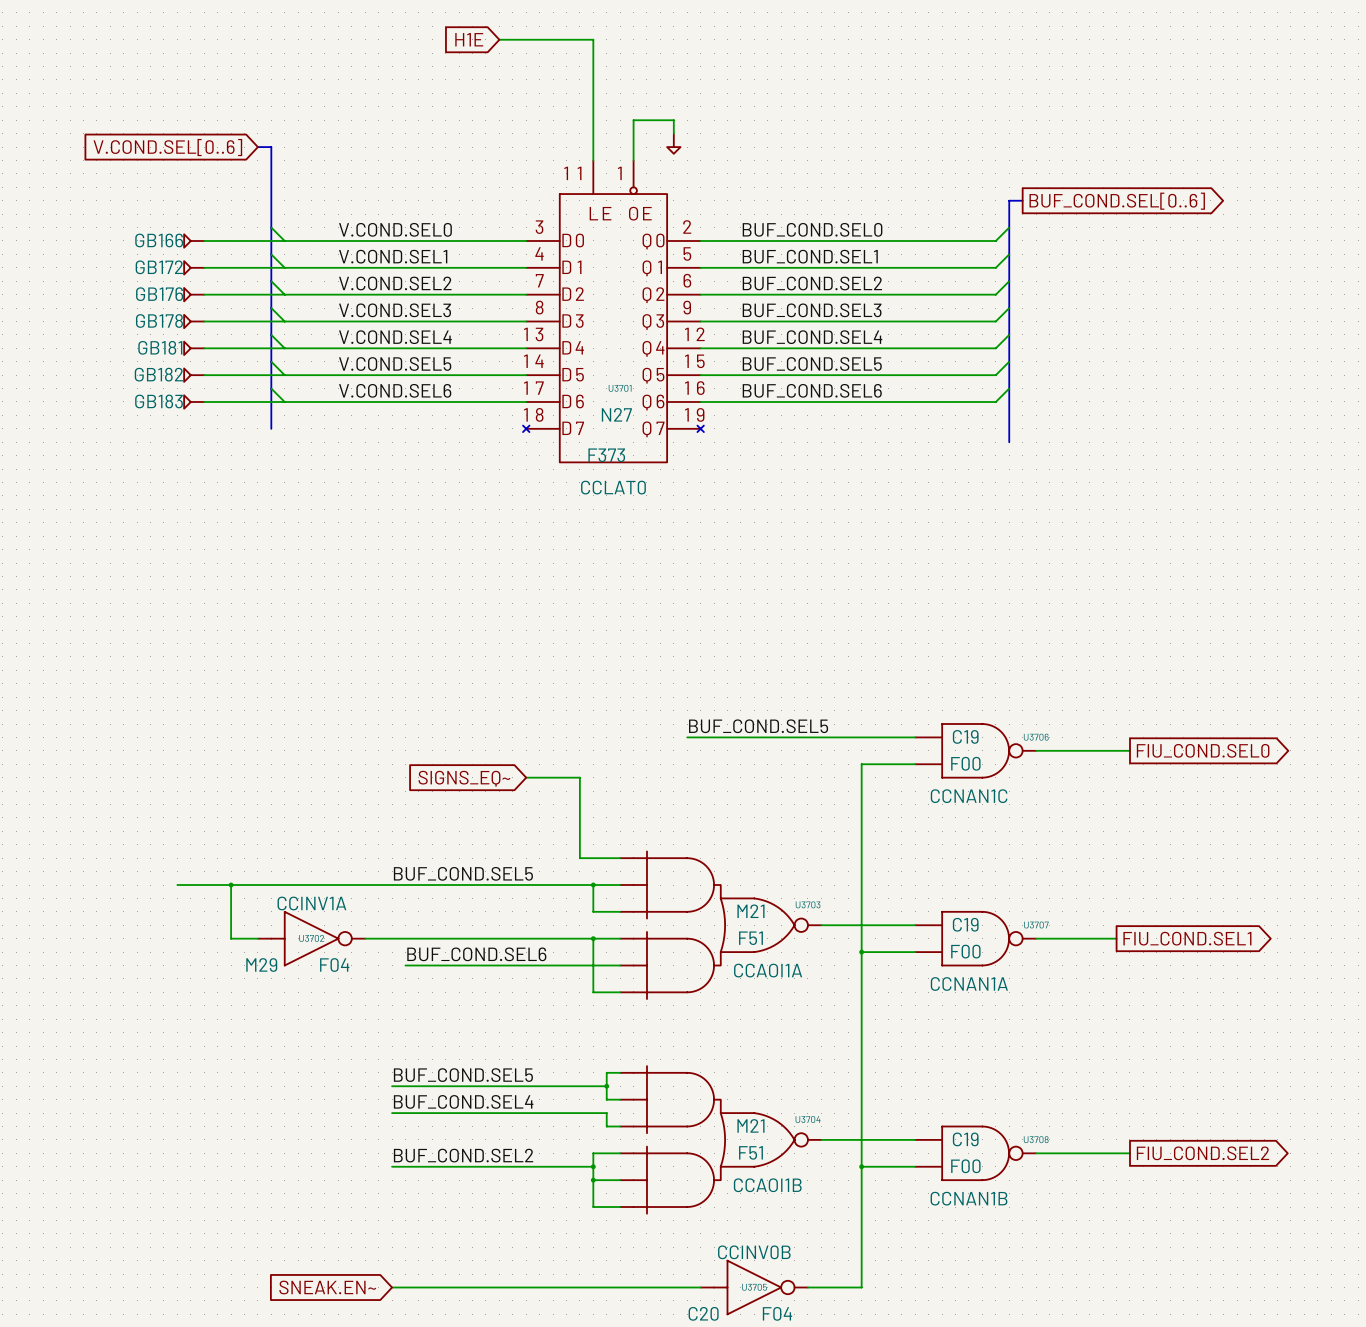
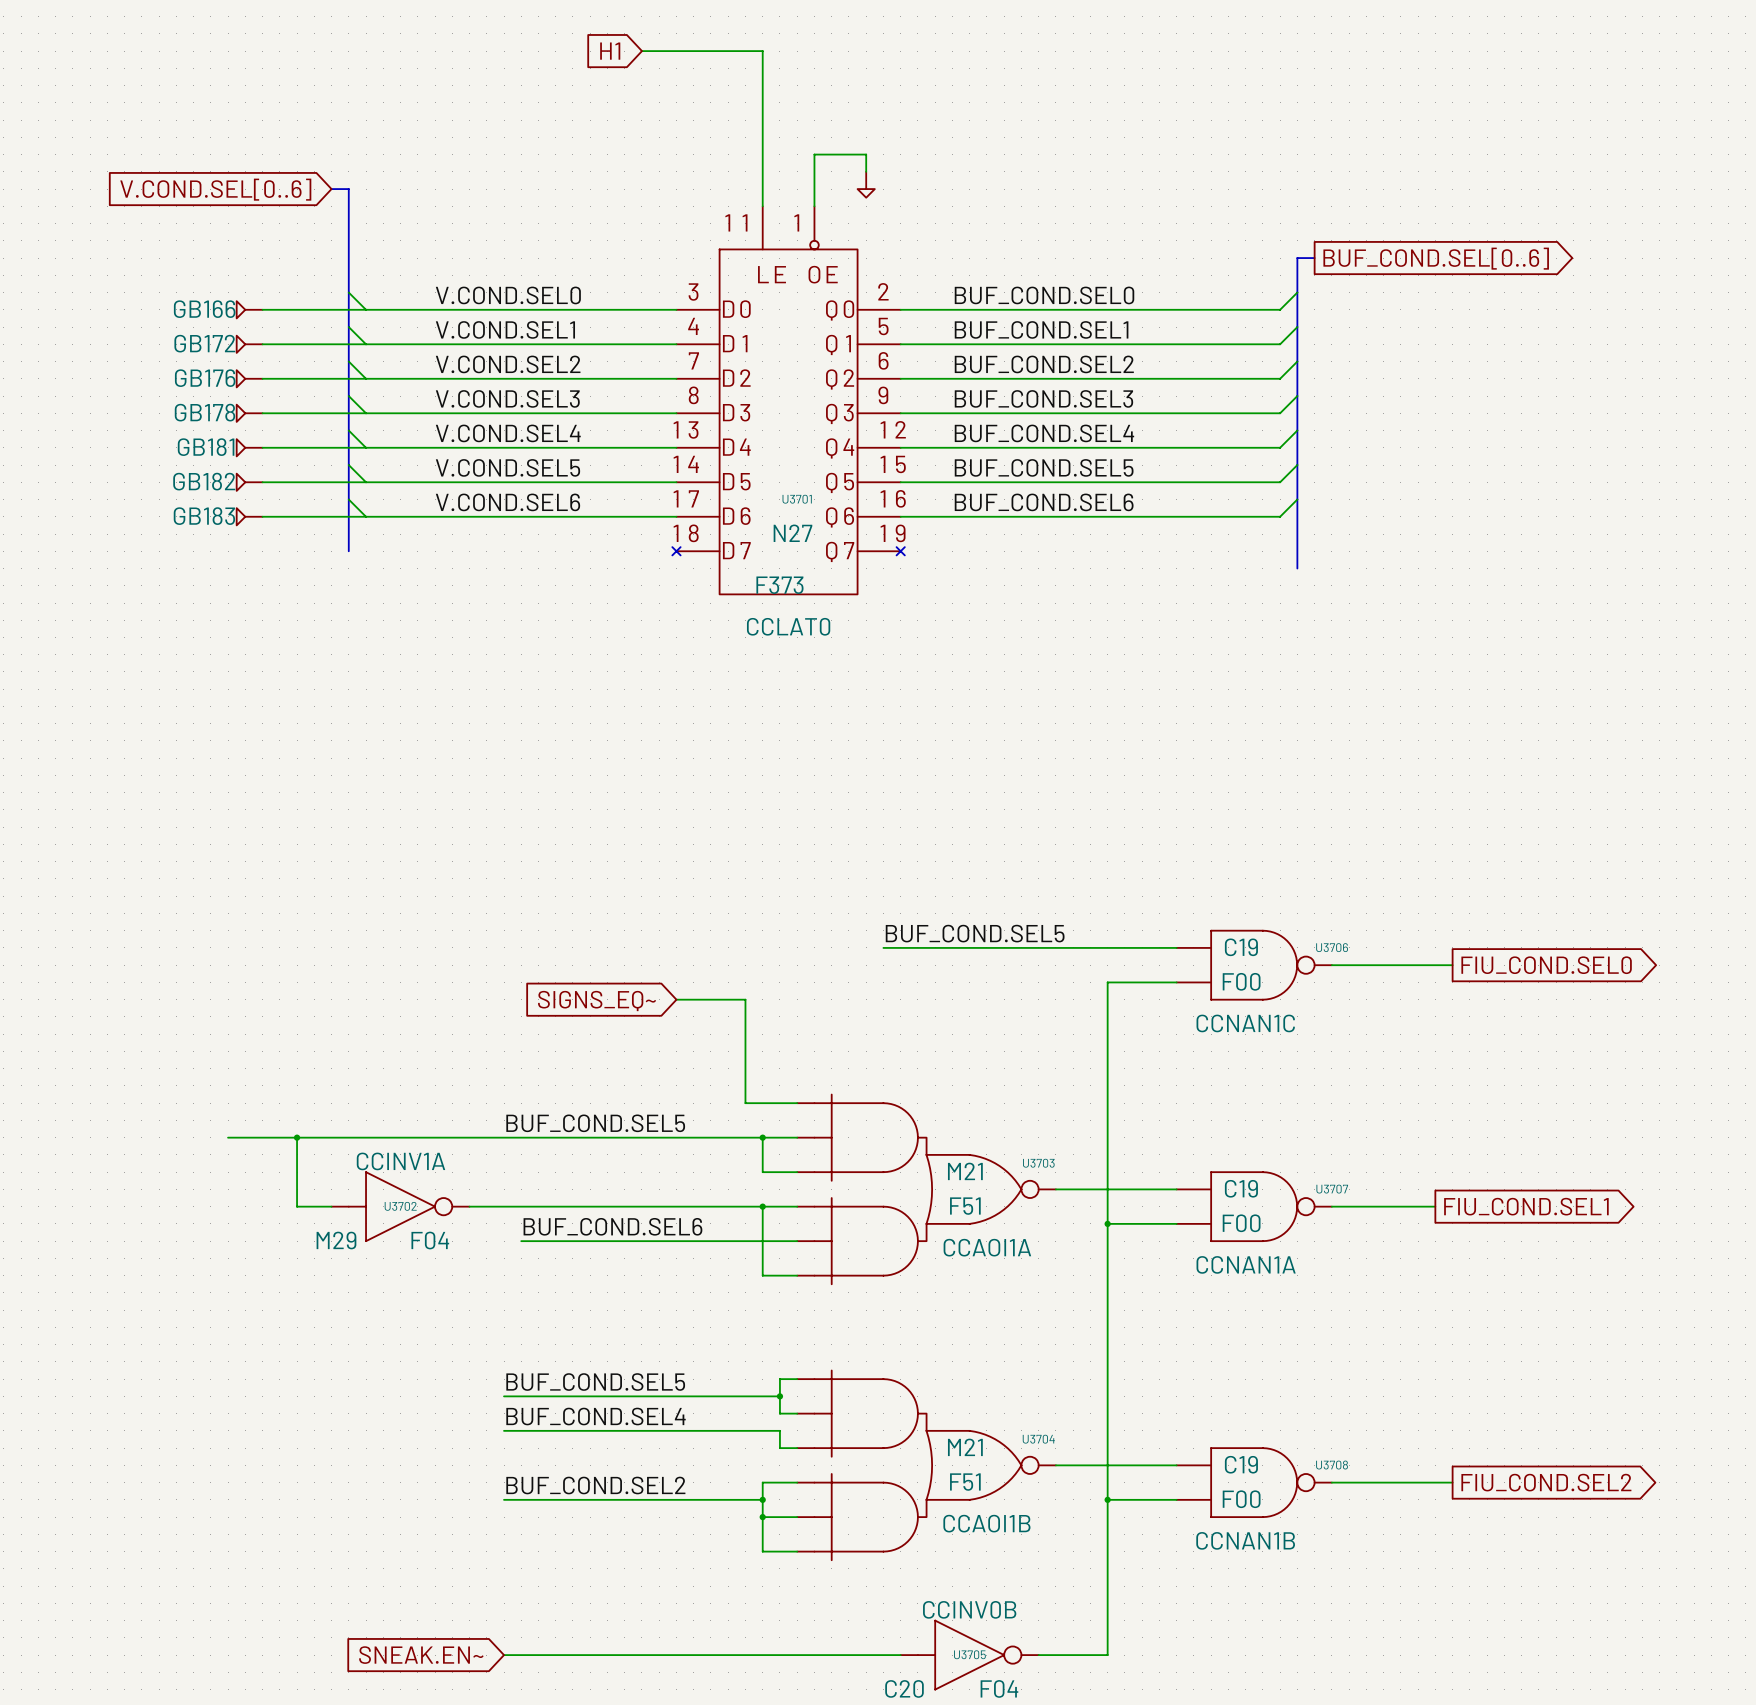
global label: H1E (469, 39) -> H1 (610, 51)

